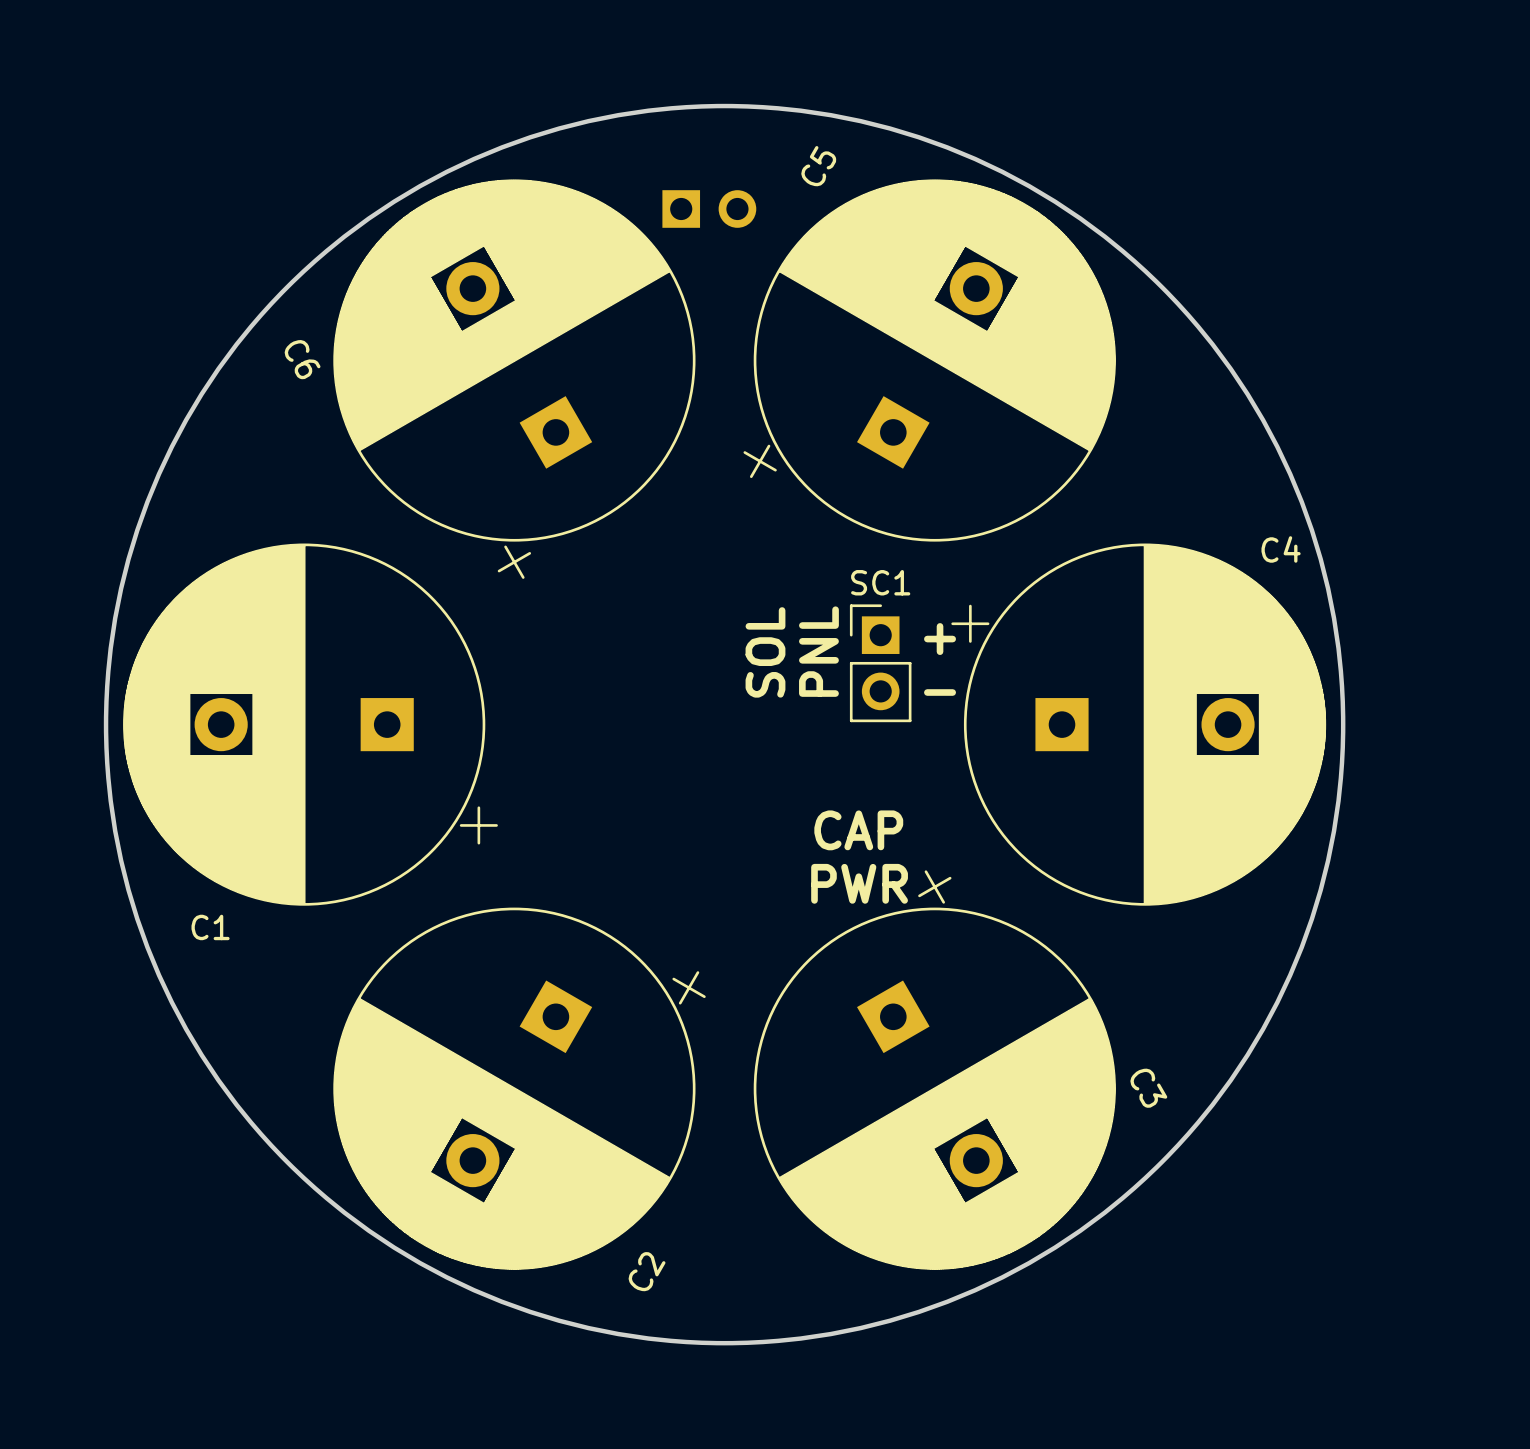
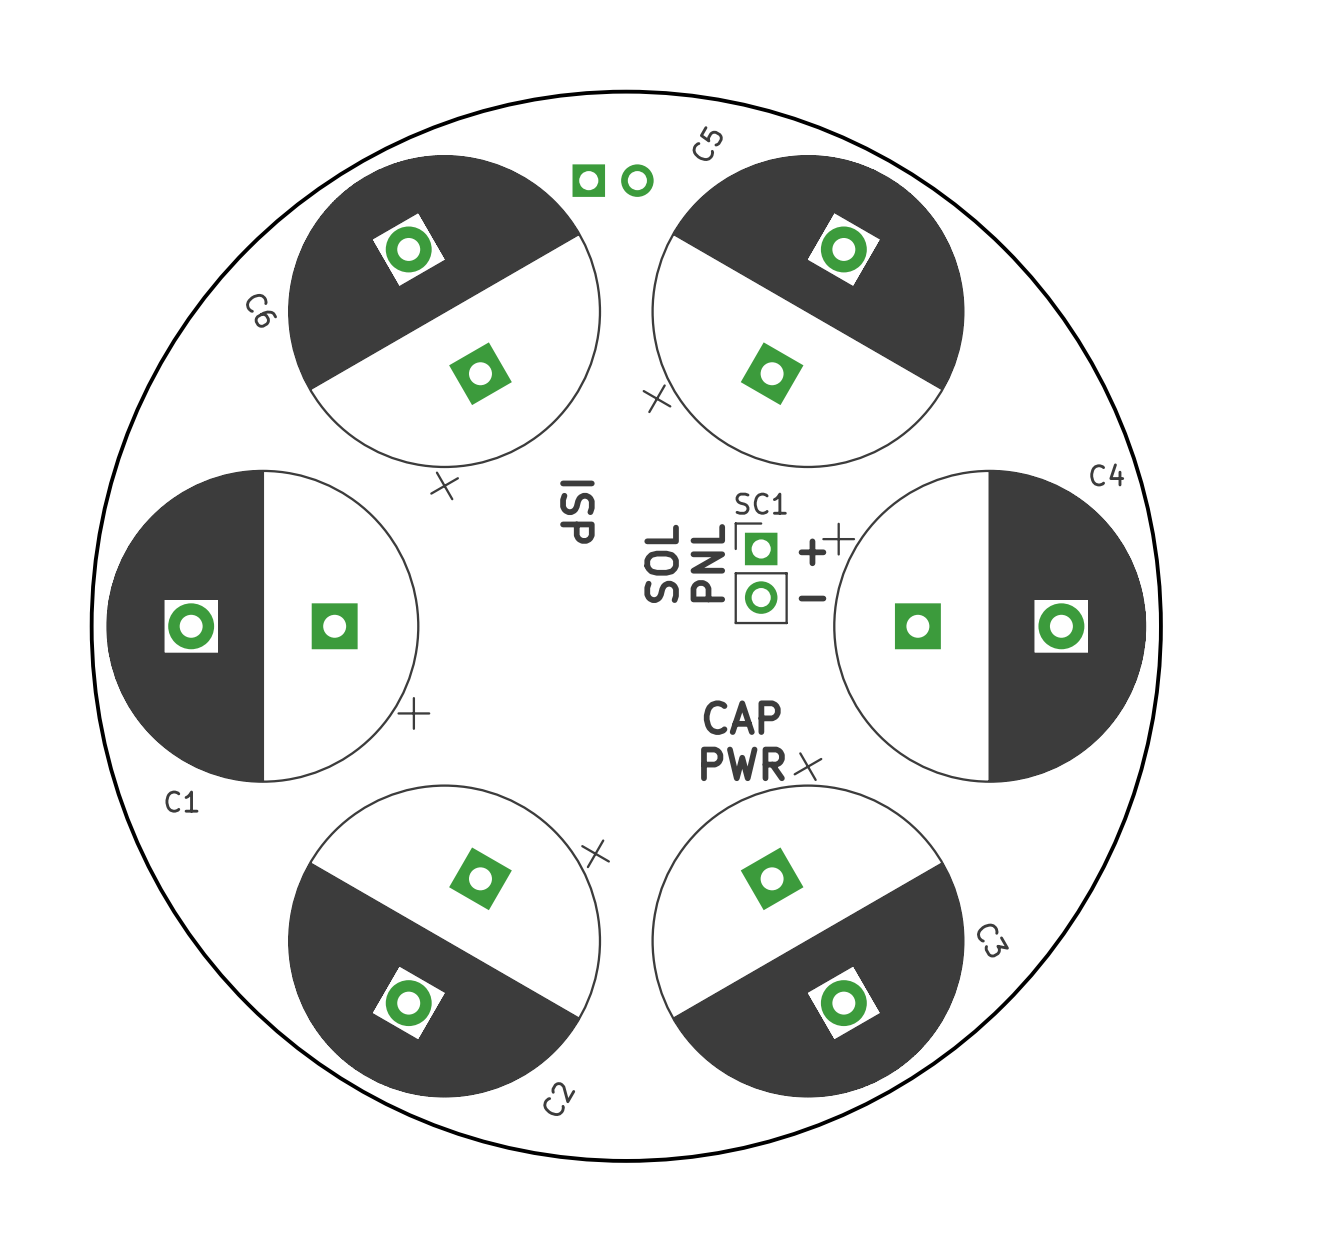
text: none -> ISP (577, 512)

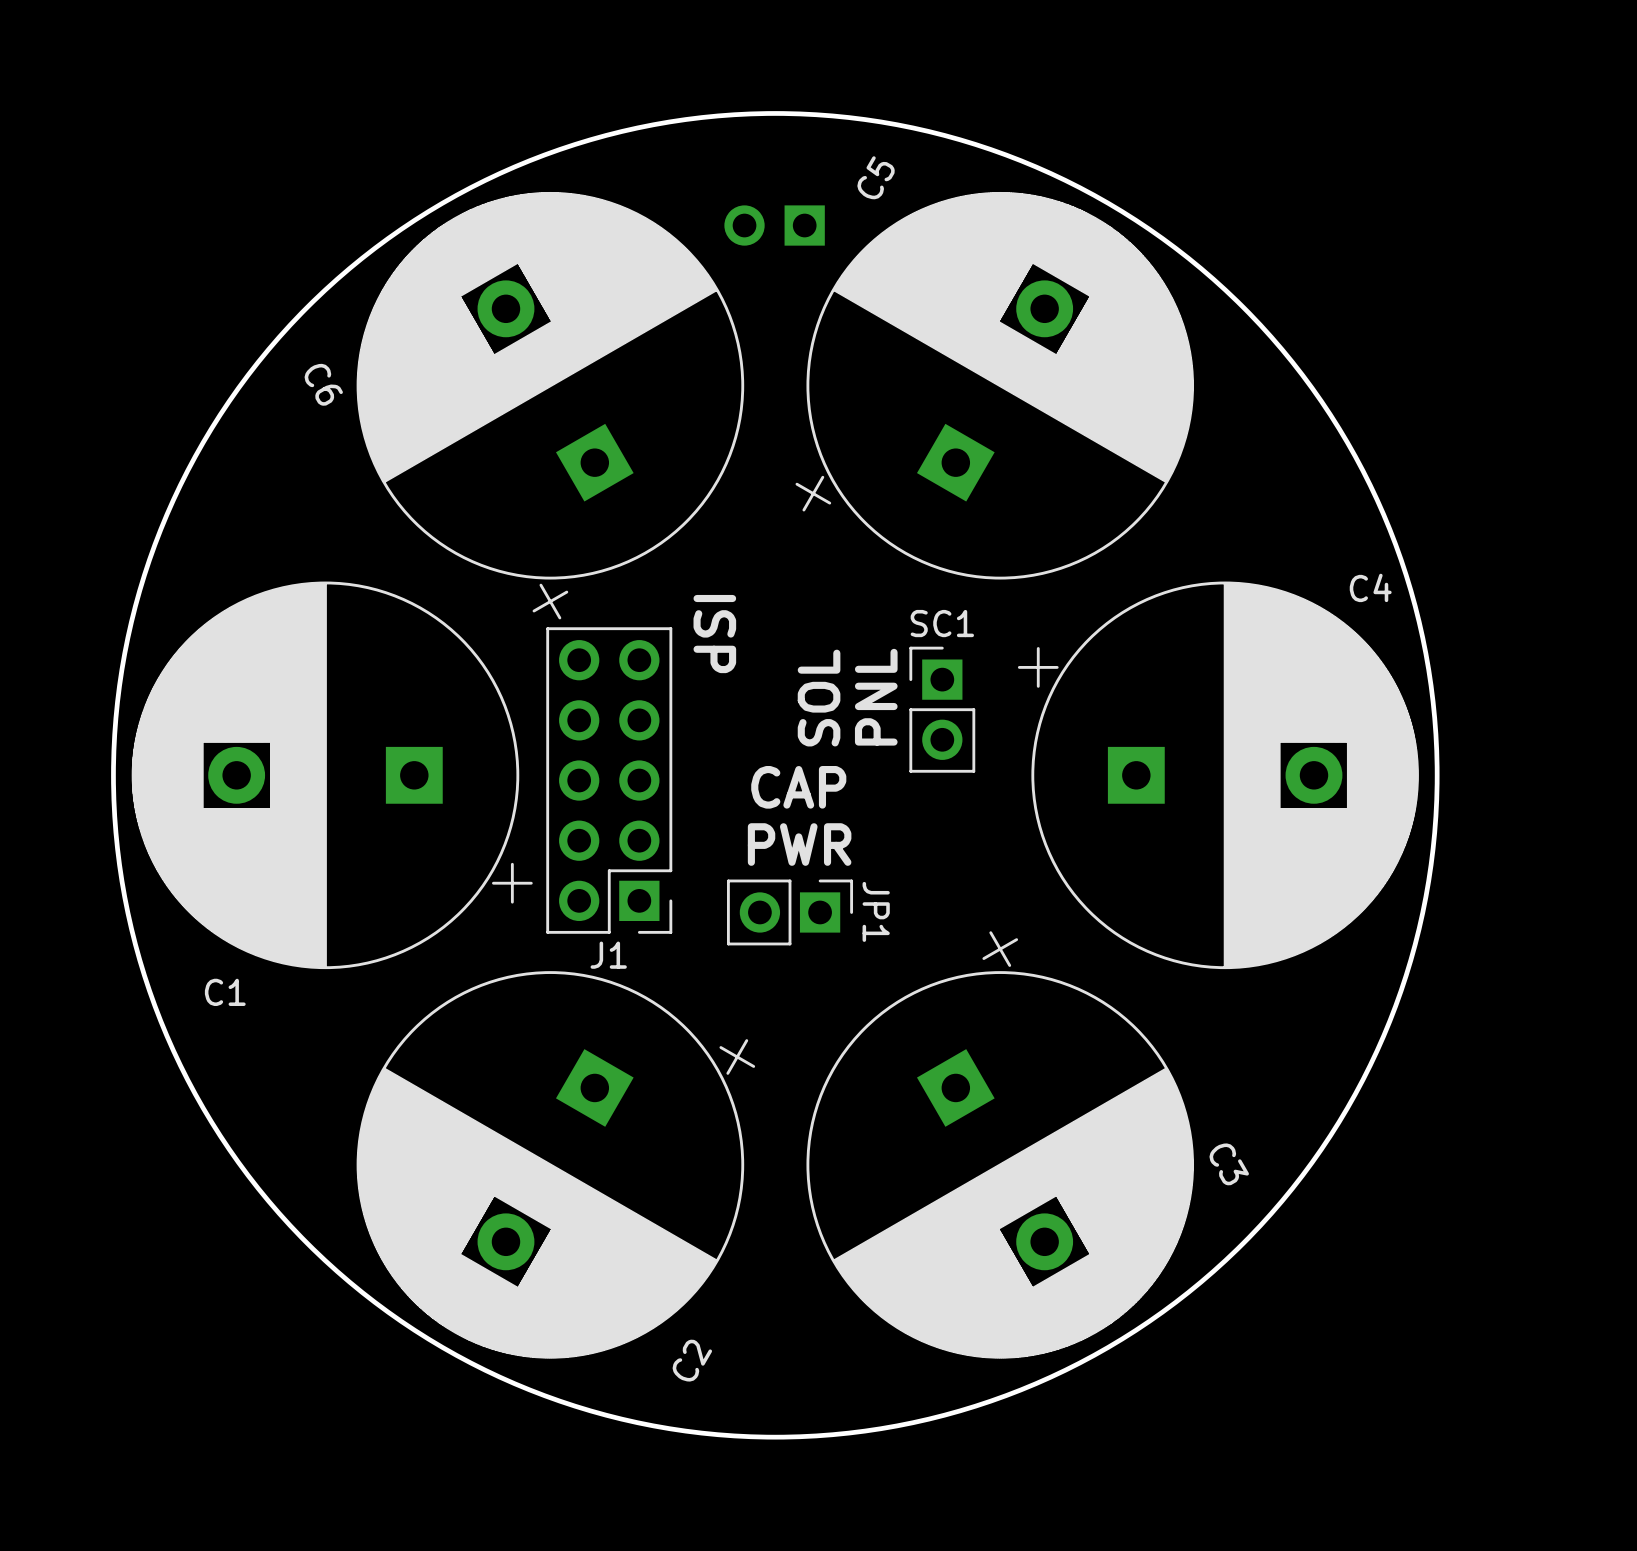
part rotation: 0° (613, 180) -> 180° (774, 225)
text: + (812, 552) -> none
text: - (812, 598) -> none
J1: none -> (609, 780)
text position: CAP (742, 717) -> CAP (798, 787)
JP1: none -> (790, 912)
text position: PWR (742, 763) -> PWR (799, 844)

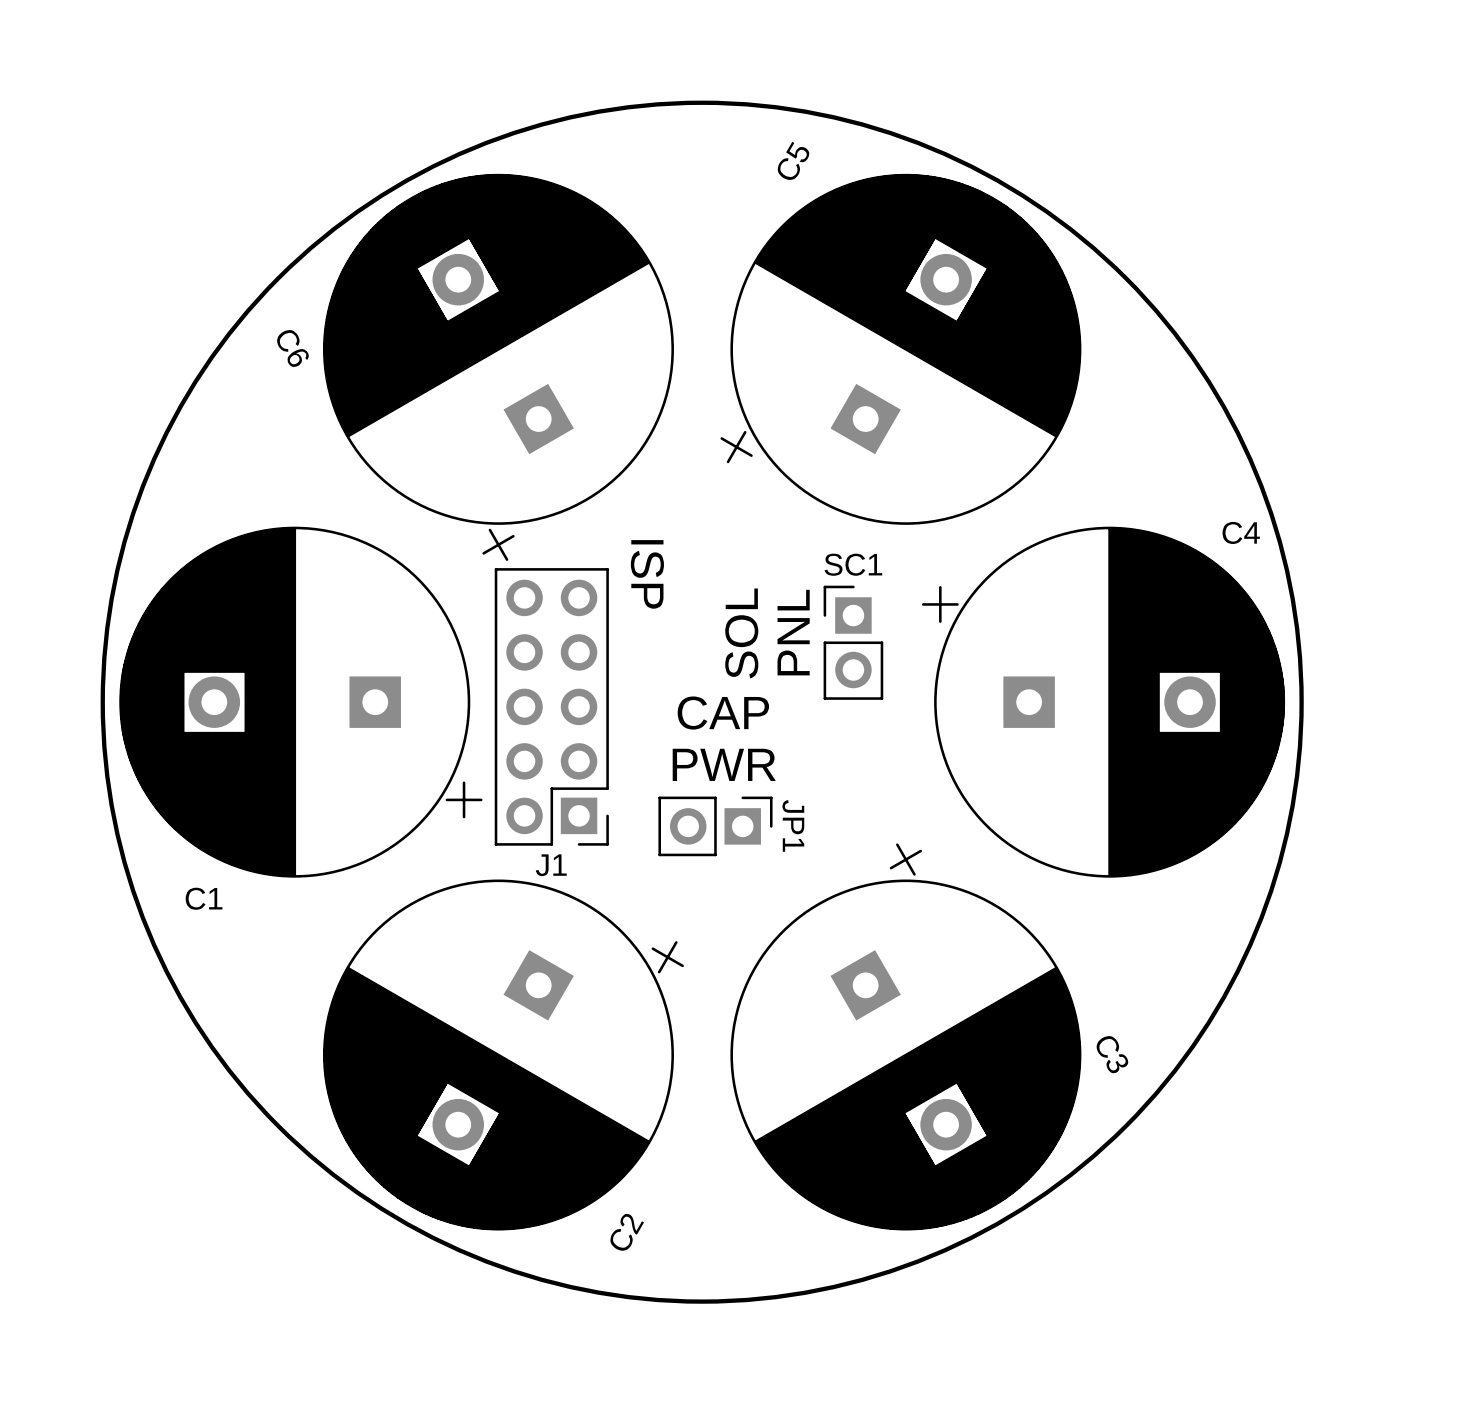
part: (774, 225) -> none

